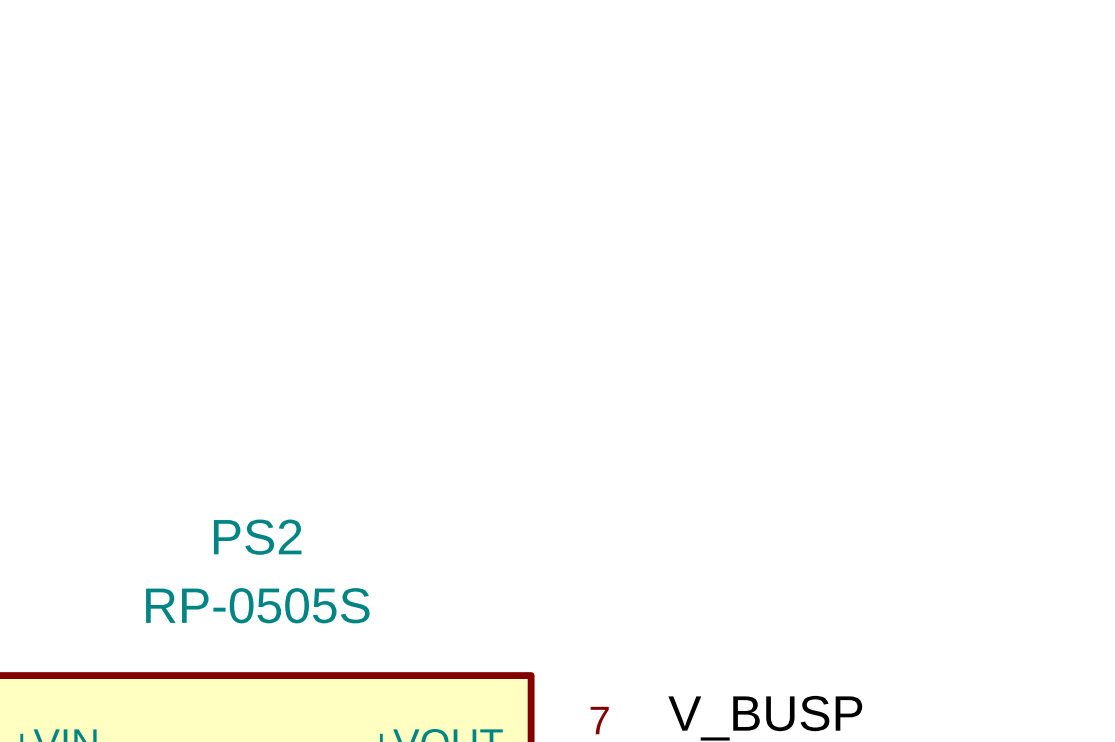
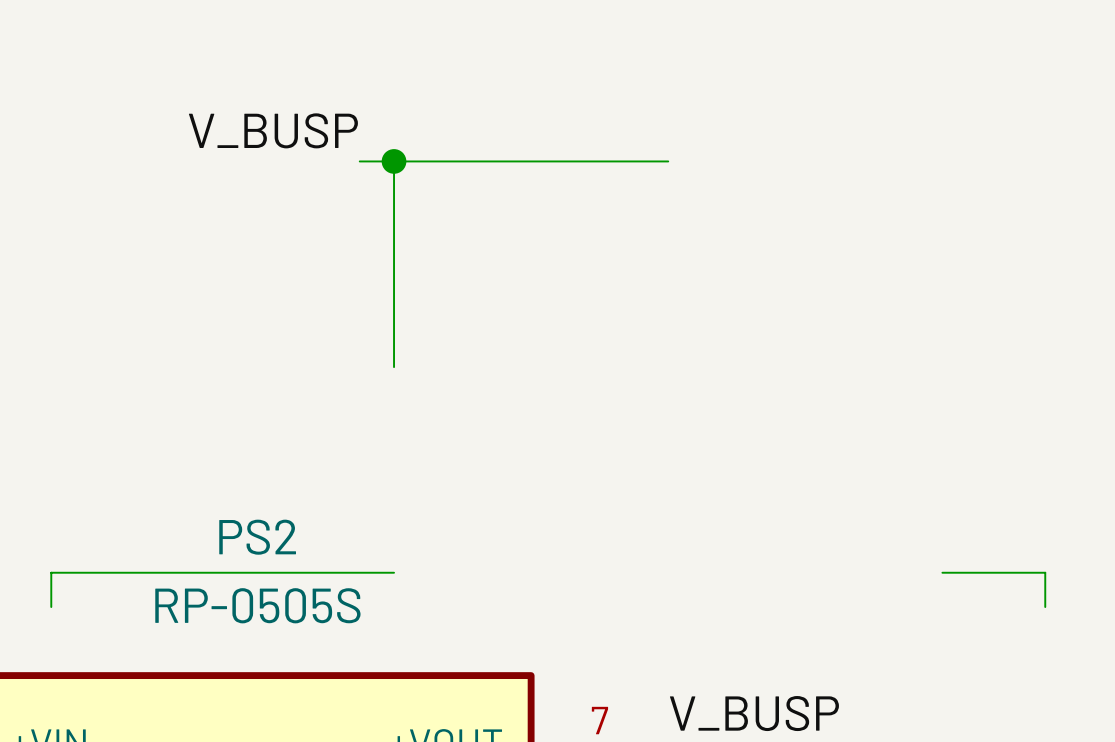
label: none -> V_BUSP (273, 130)
wire: none -> (359, 161) (668, 161)
wire: none -> (394, 161) (394, 367)
junction: none -> (394, 161)
wire: none -> (394, 572) (51, 572) (51, 607)
wire: none -> (942, 572) (1045, 572) (1045, 607)

